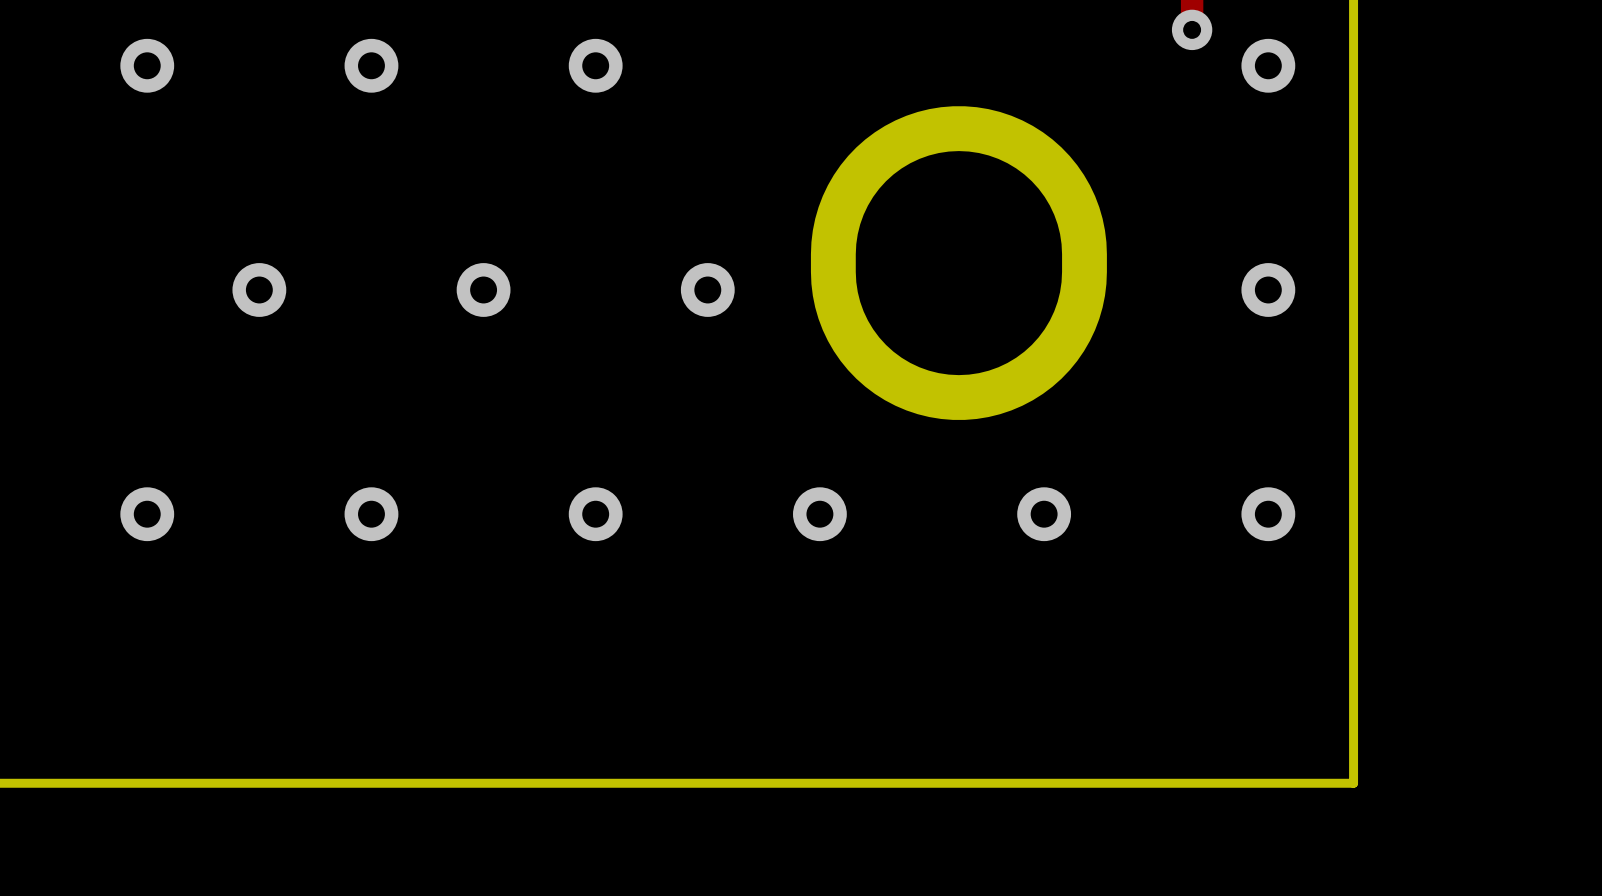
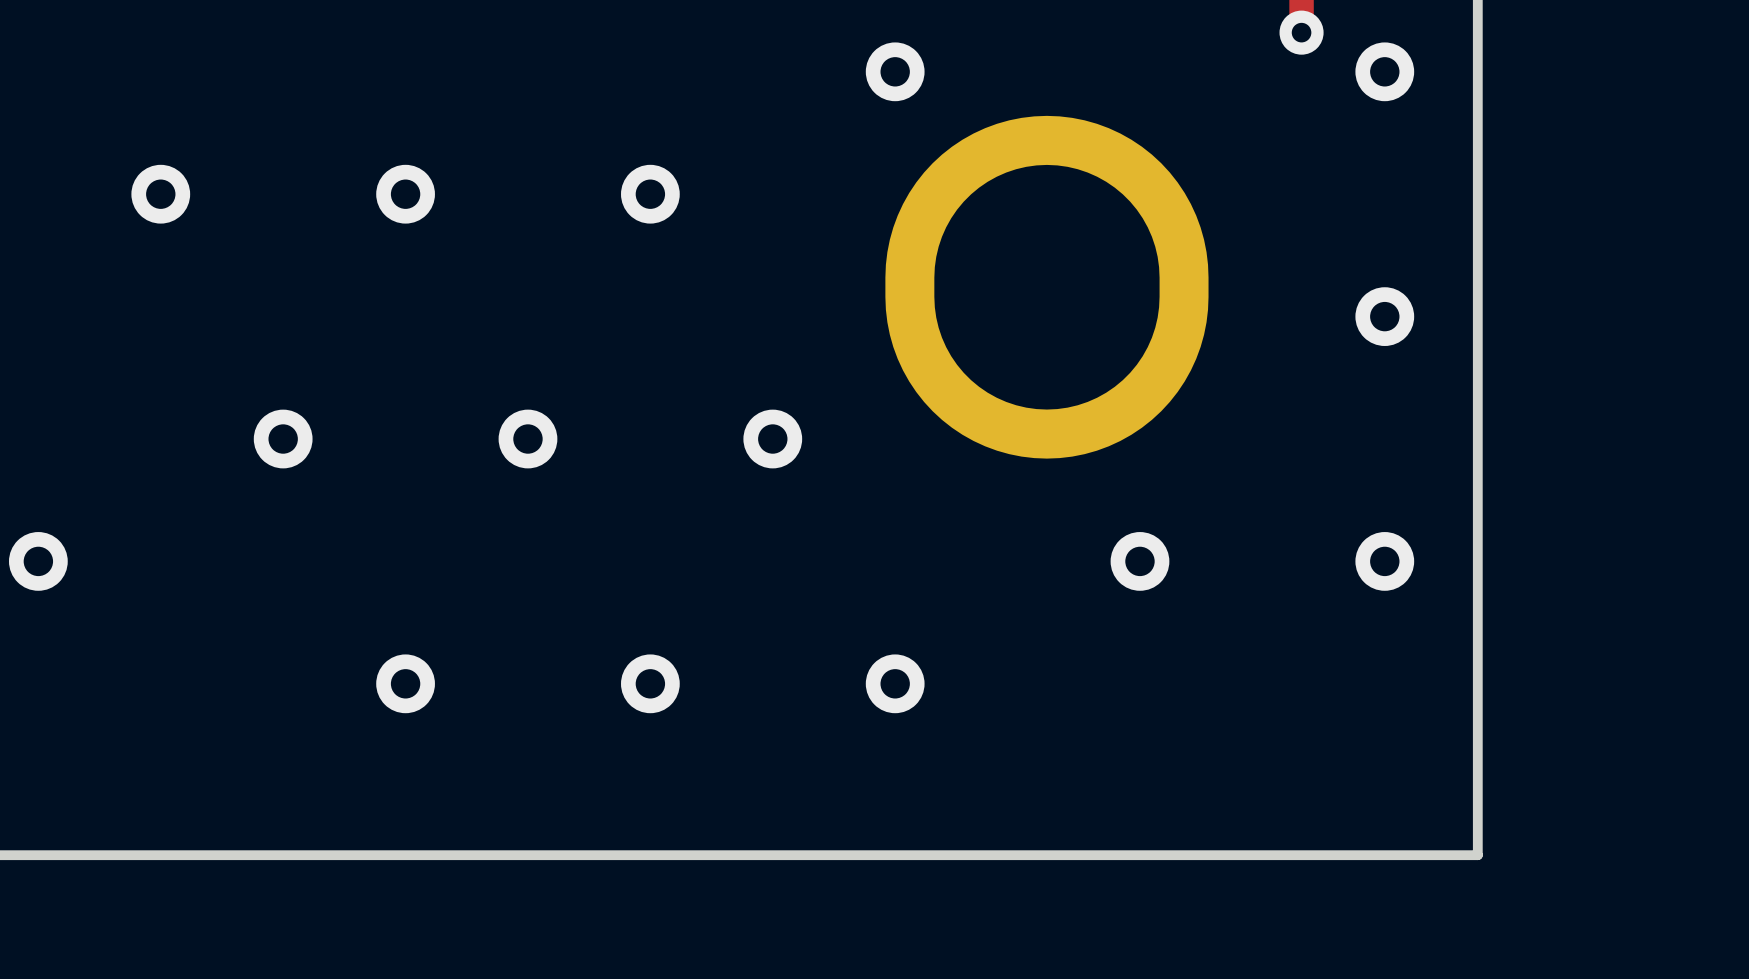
via: (147, 65) -> none
via: (371, 65) -> none
via: (595, 65) -> none
via: none -> (895, 71)
via: none -> (160, 194)
via: none -> (405, 194)
via: none -> (650, 194)
via: (259, 289) -> none
via: (483, 289) -> none
via: (707, 289) -> none
via: none -> (283, 439)
via: none -> (527, 439)
via: none -> (772, 439)
via: none -> (38, 561)
via: (147, 514) -> none
via: (371, 514) -> none
via: (595, 514) -> none
via: (819, 514) -> none
via: none -> (405, 683)
via: none -> (650, 683)
via: none -> (895, 683)

